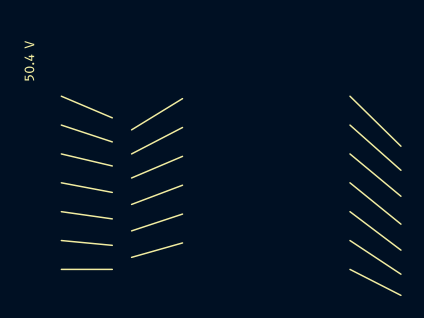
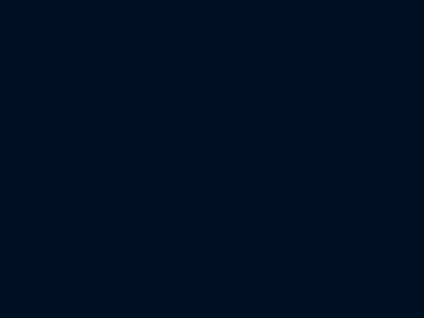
text: 50.4 V (29, 60) -> none
line: (61, 96) (112, 117) -> none
line: (349, 96) (400, 146) -> none
line: (182, 98) (131, 129) -> none
line: (61, 125) (112, 141) -> none
line: (349, 125) (400, 170) -> none
line: (182, 127) (131, 153) -> none
line: (61, 153) (112, 165) -> none
line: (349, 153) (400, 196) -> none
line: (182, 156) (131, 177) -> none
line: (61, 182) (112, 192) -> none
line: (349, 182) (400, 224) -> none
line: (182, 185) (131, 204) -> none
line: (61, 211) (112, 218) -> none
line: (349, 211) (400, 250) -> none
line: (182, 214) (131, 230) -> none
line: (61, 240) (112, 245) -> none
line: (349, 240) (400, 274) -> none
line: (182, 242) (131, 257) -> none
line: (61, 269) (112, 269) -> none
line: (349, 269) (400, 295) -> none

